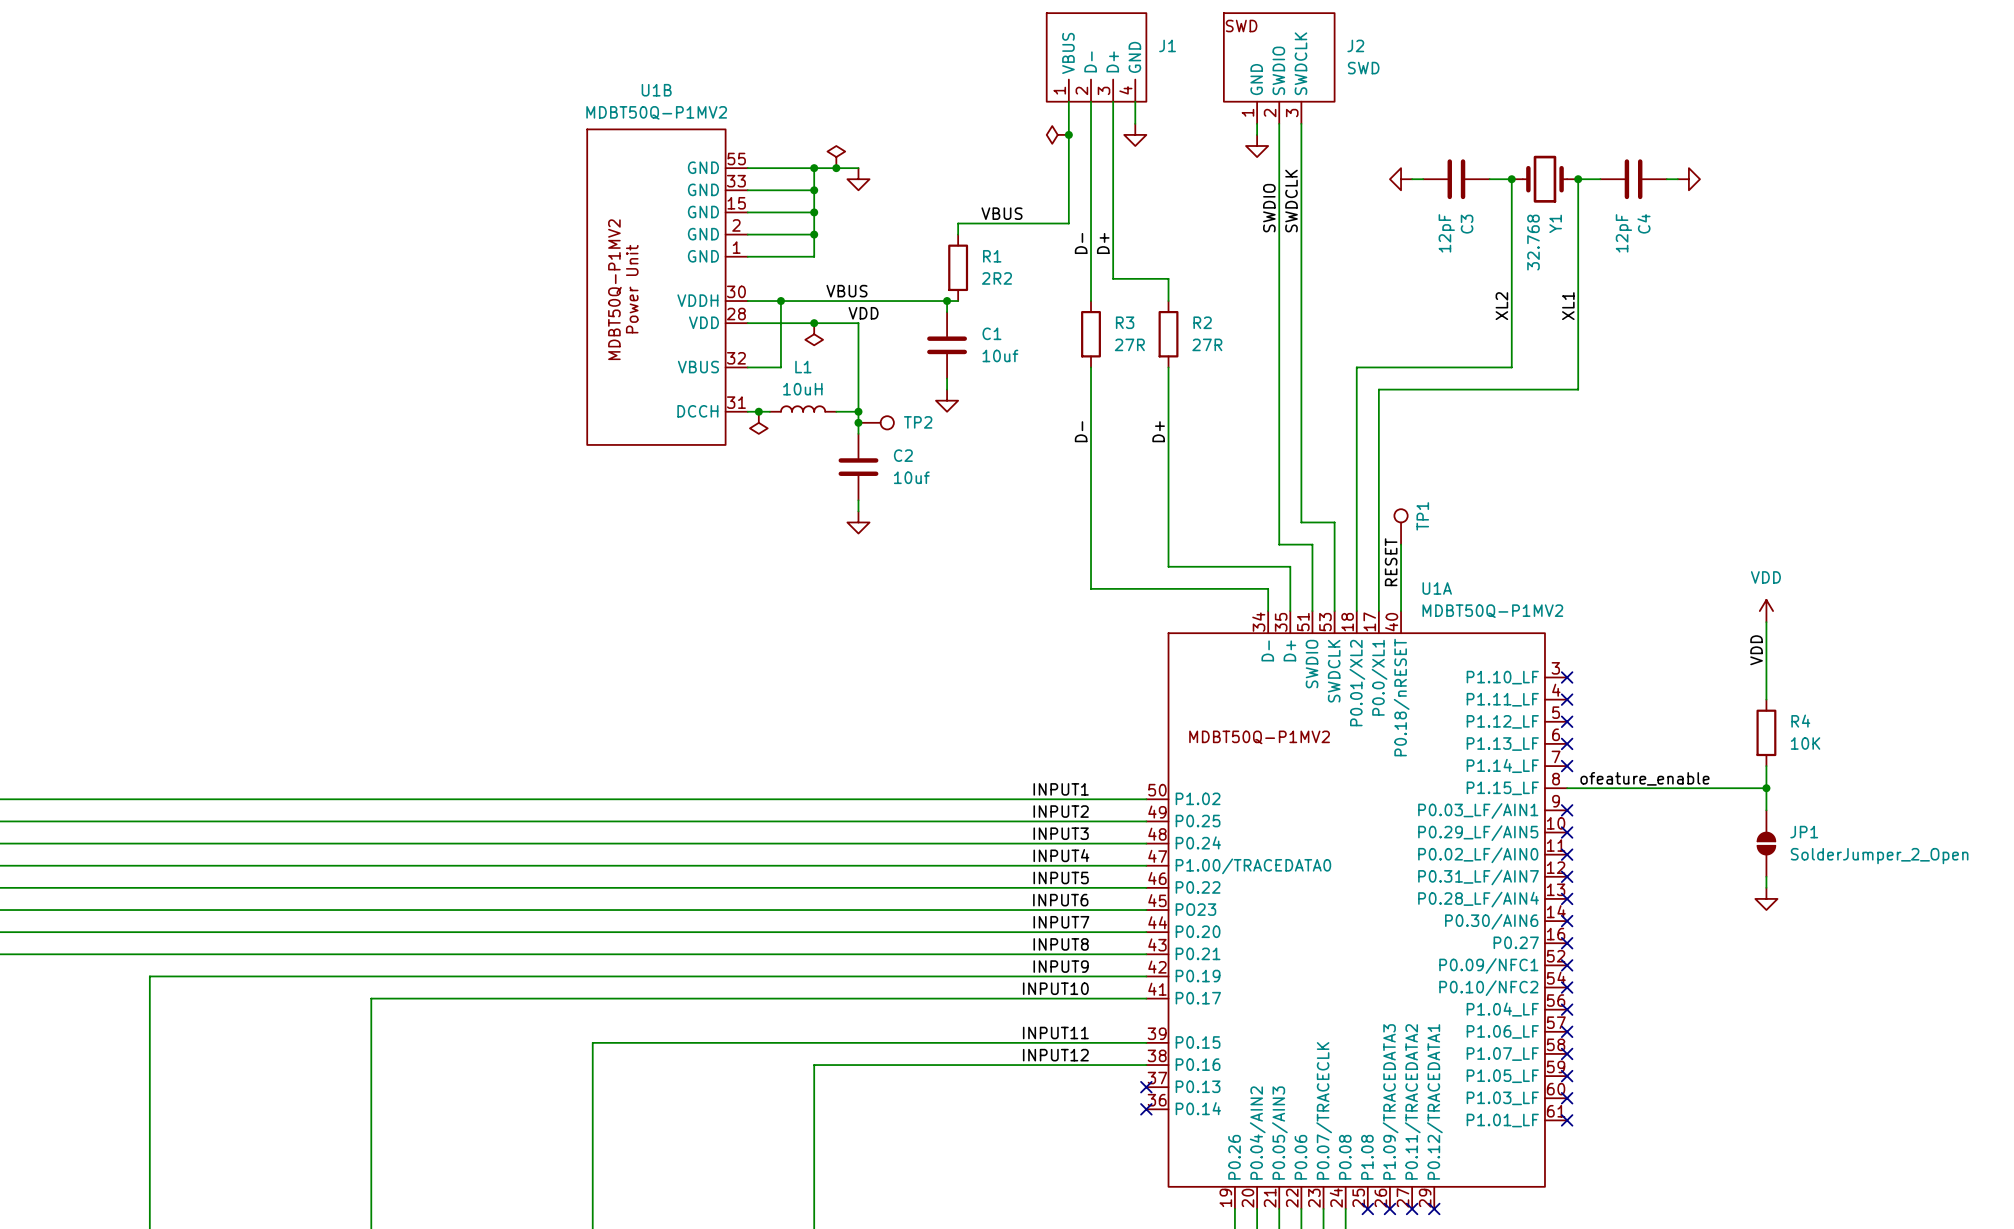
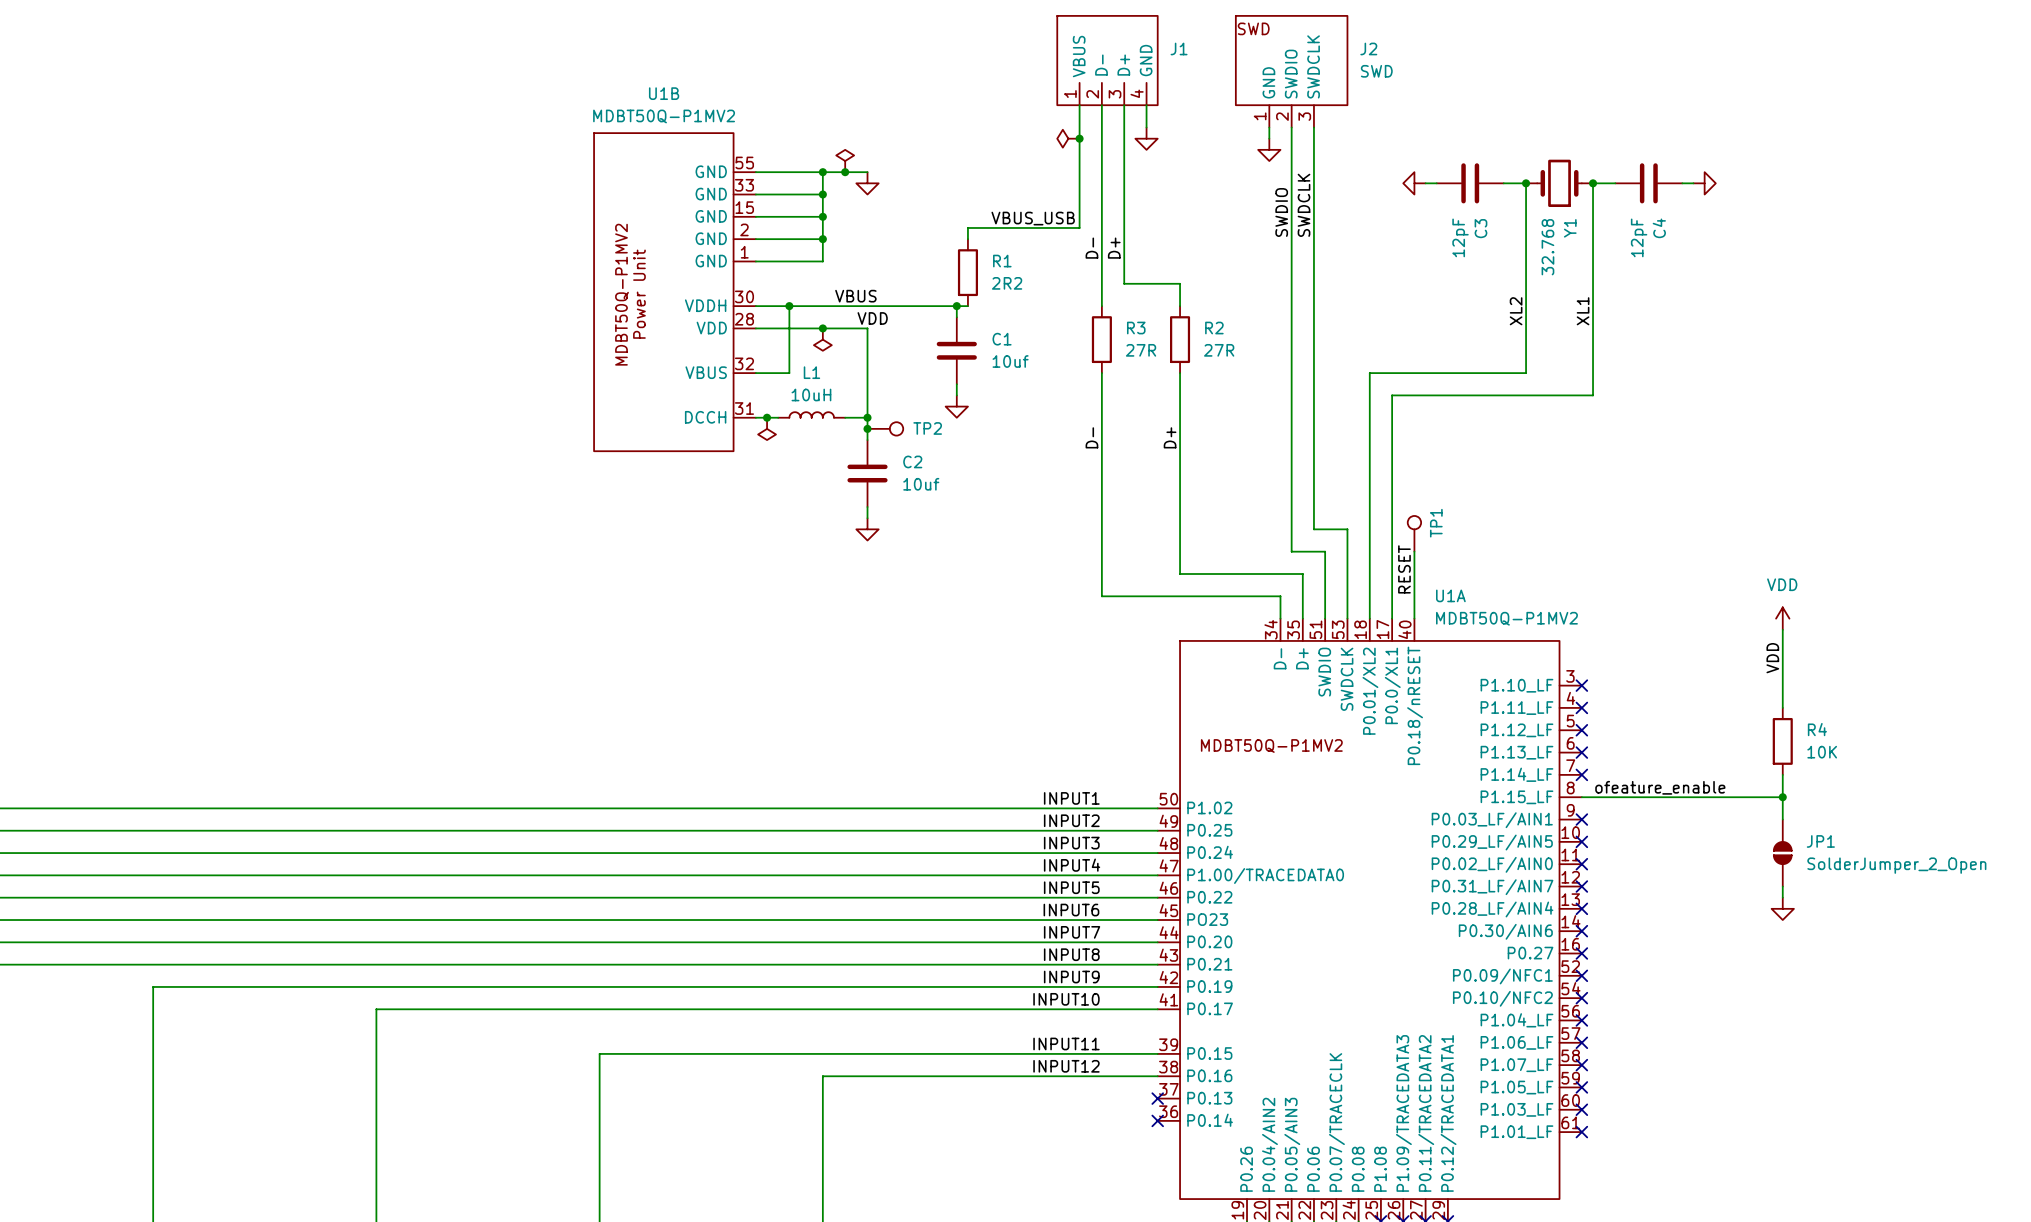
label: VBUS (1001, 213) -> VBUS_USB (1033, 218)

